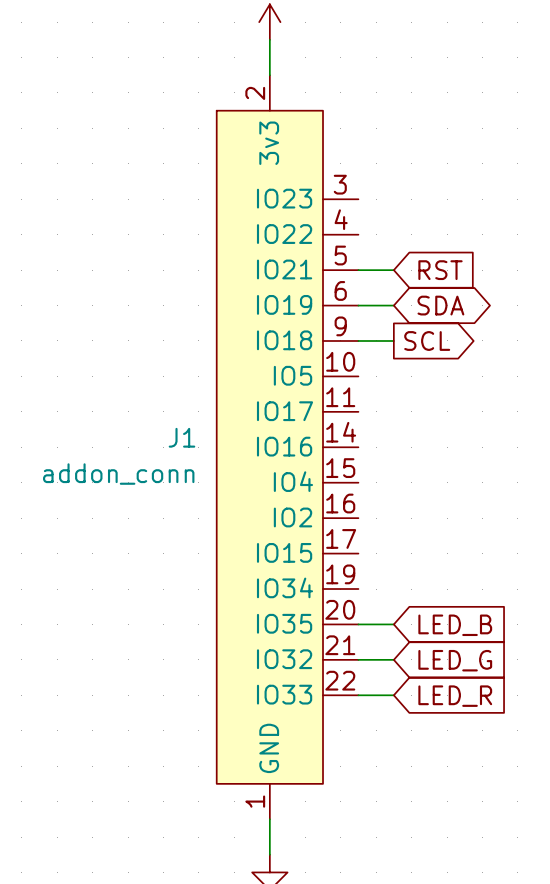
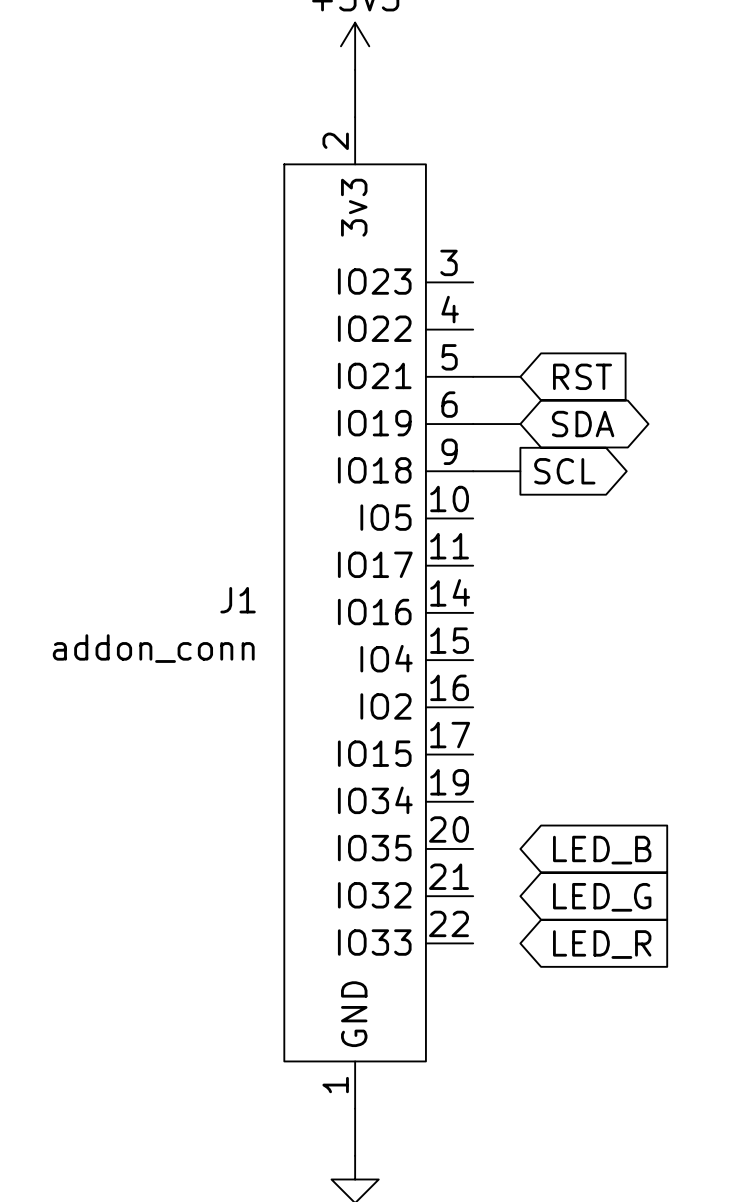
wire: (358, 624) (393, 624) -> none
wire: (358, 659) (393, 659) -> none
wire: (358, 695) (393, 695) -> none

